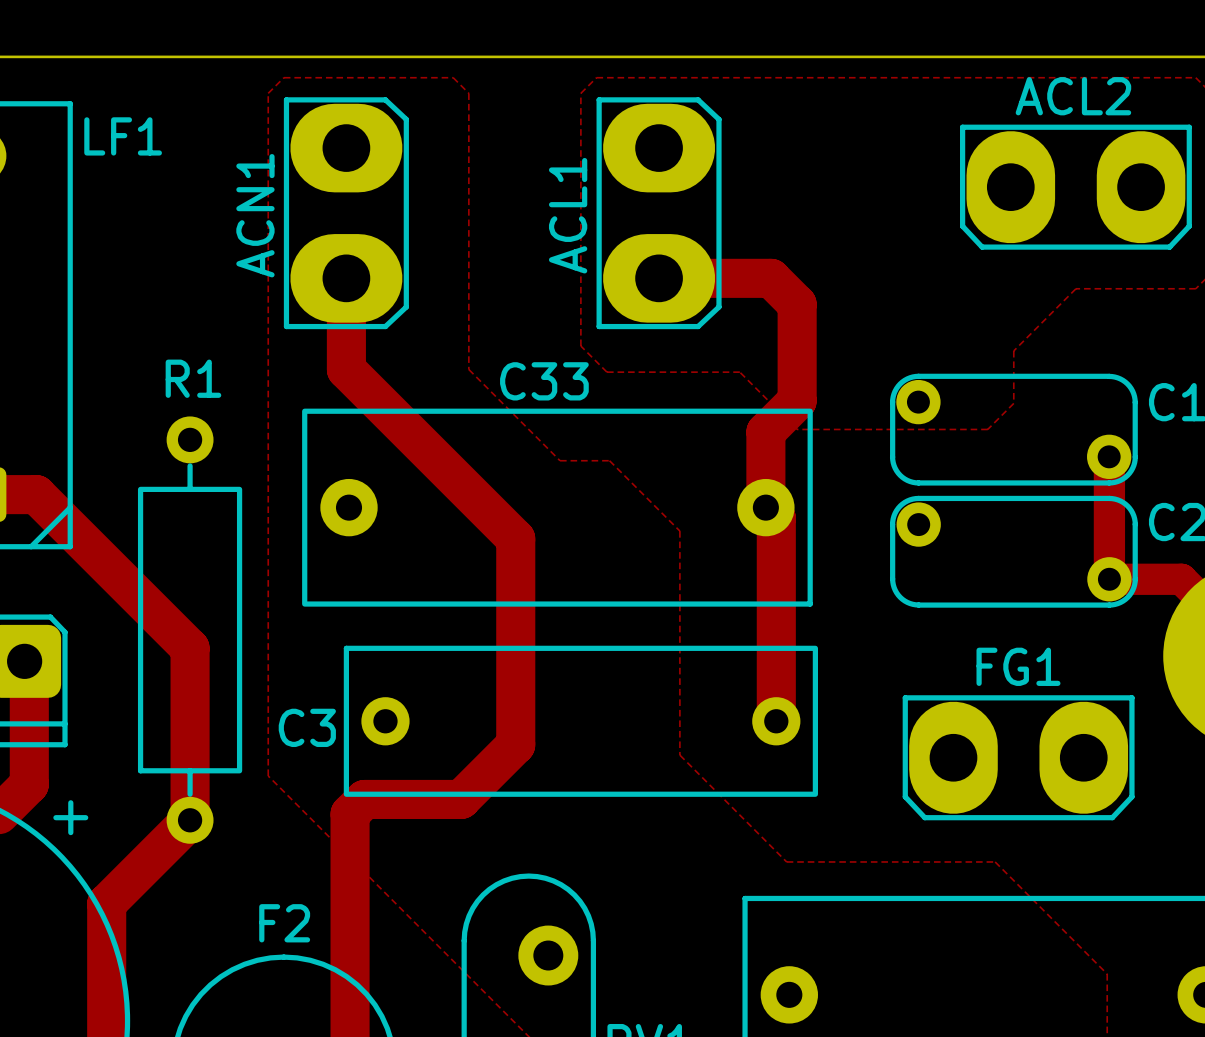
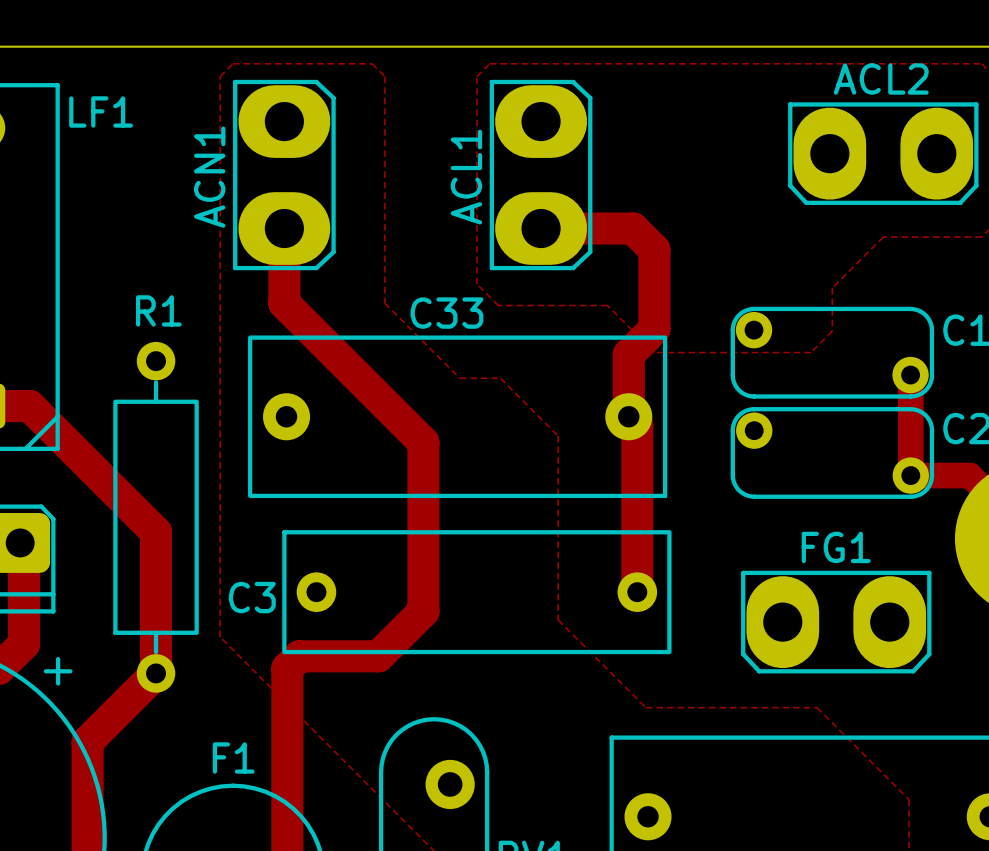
F2 name: F2 (284, 923) -> F1 (233, 757)

